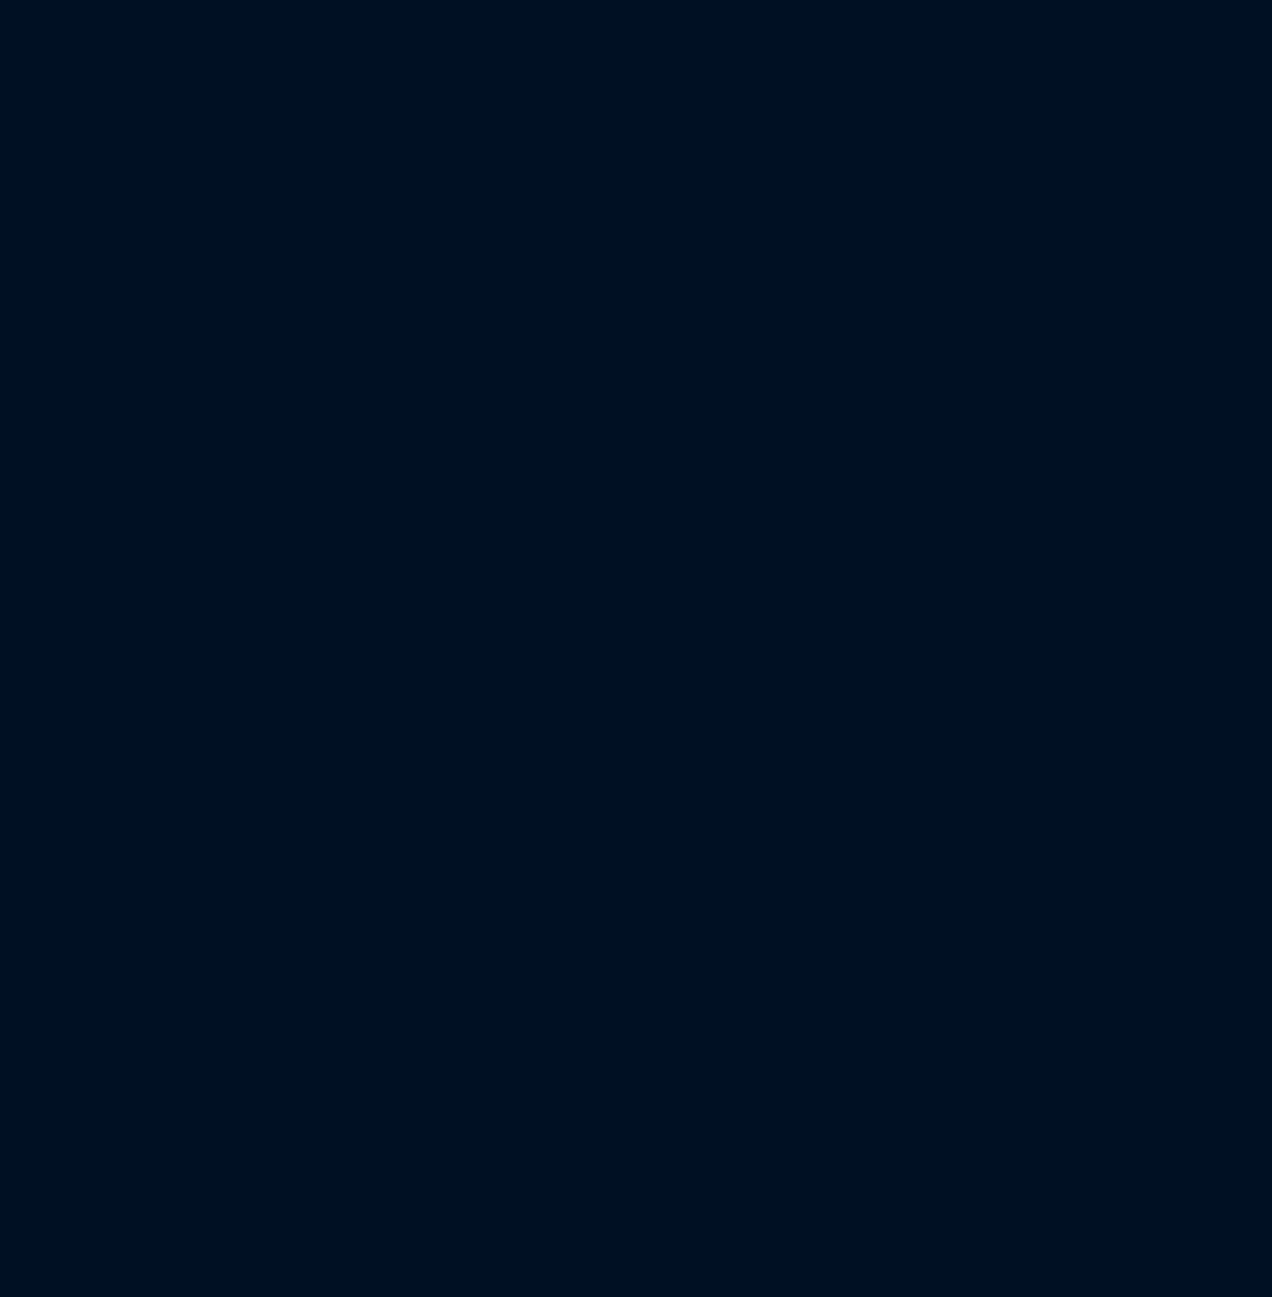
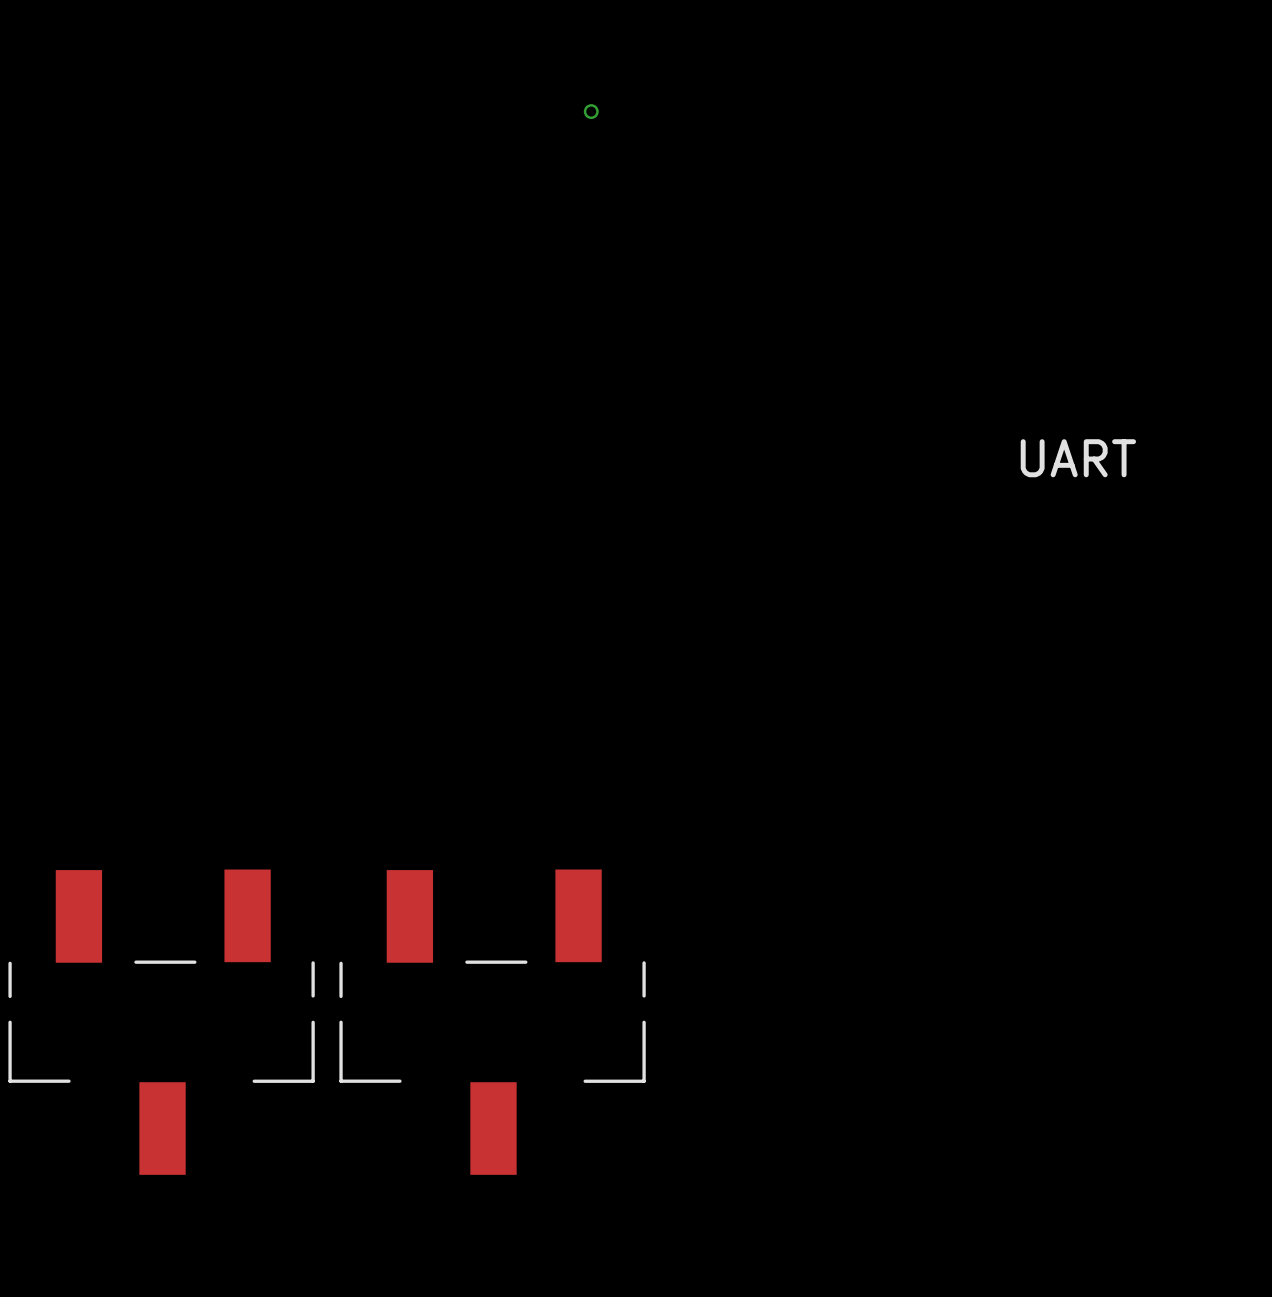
via: none -> (591, 111)
text: none -> UART (1078, 458)
part: none -> (161, 1022)
part: none -> (492, 1022)

